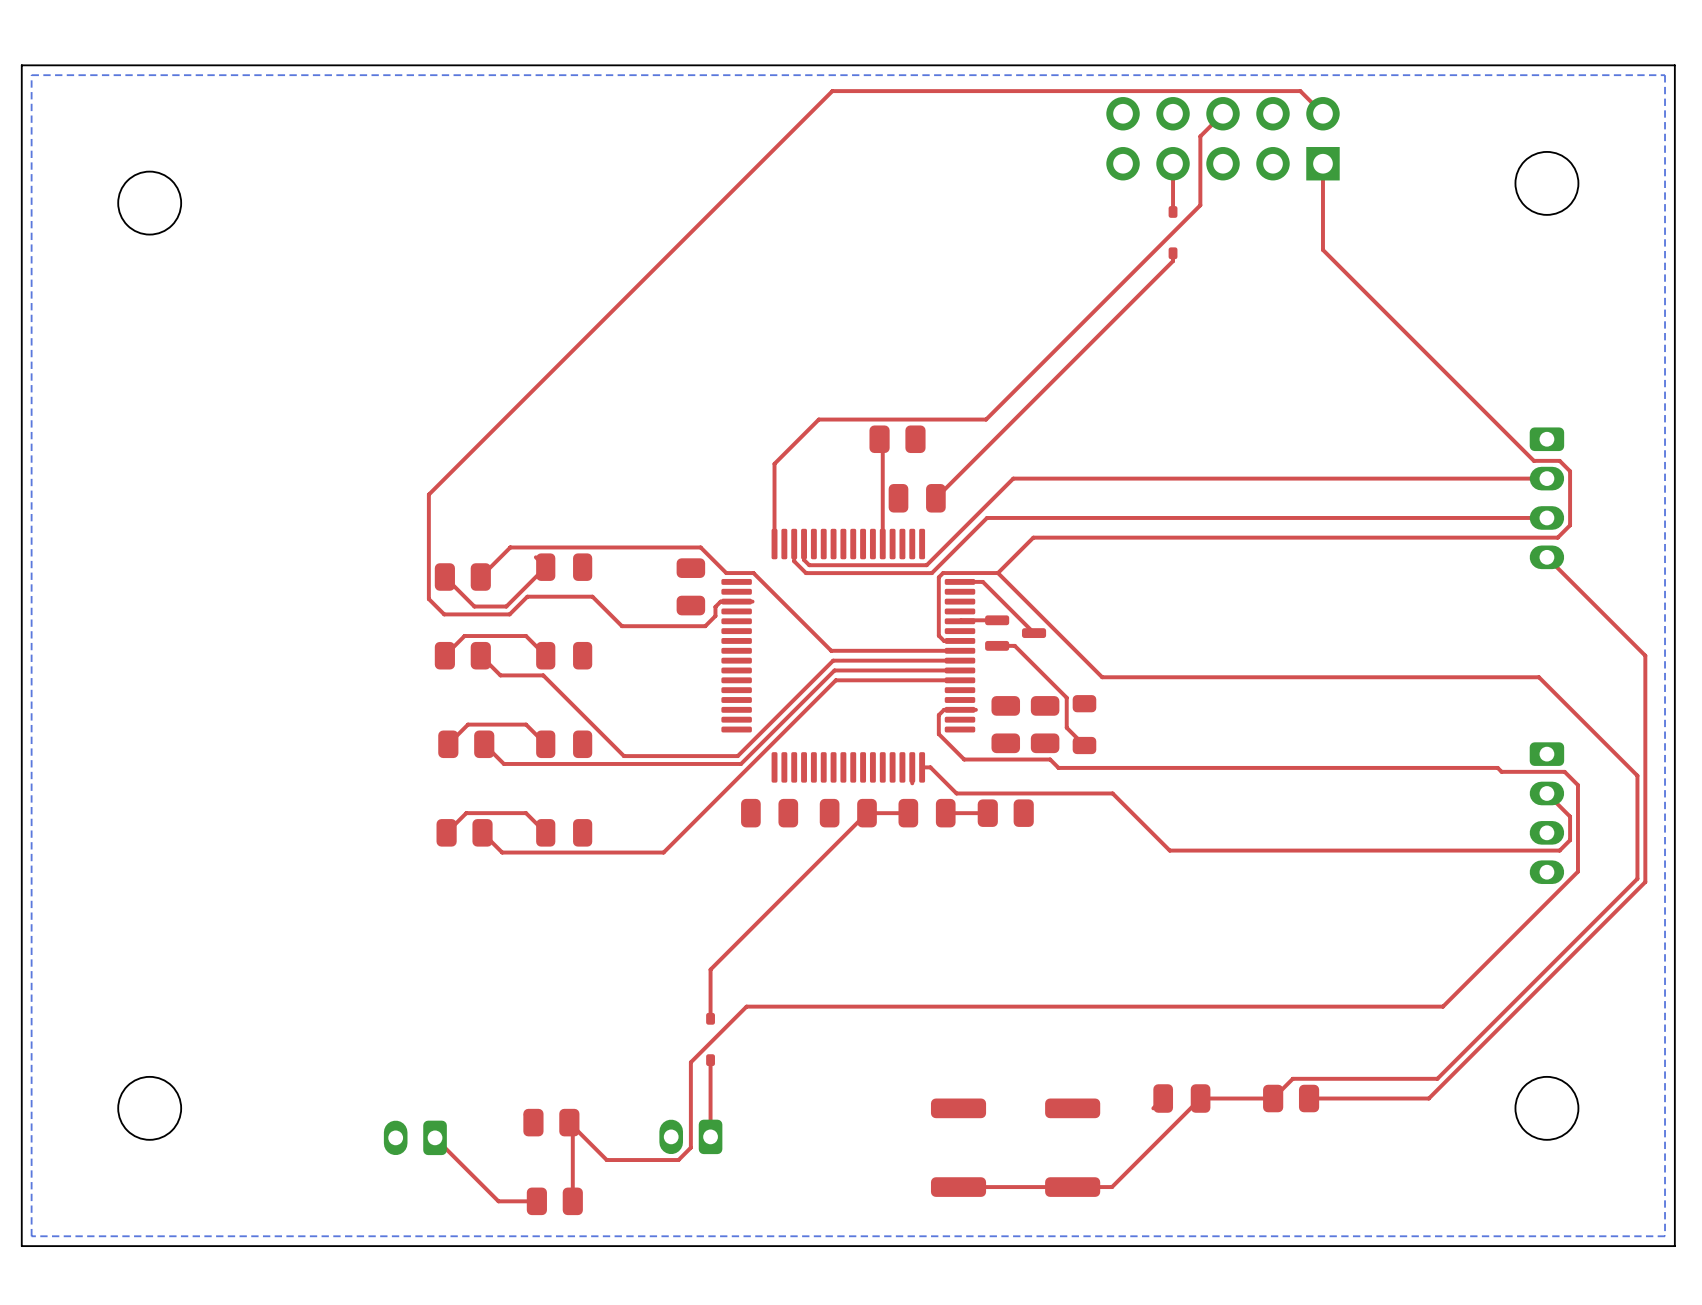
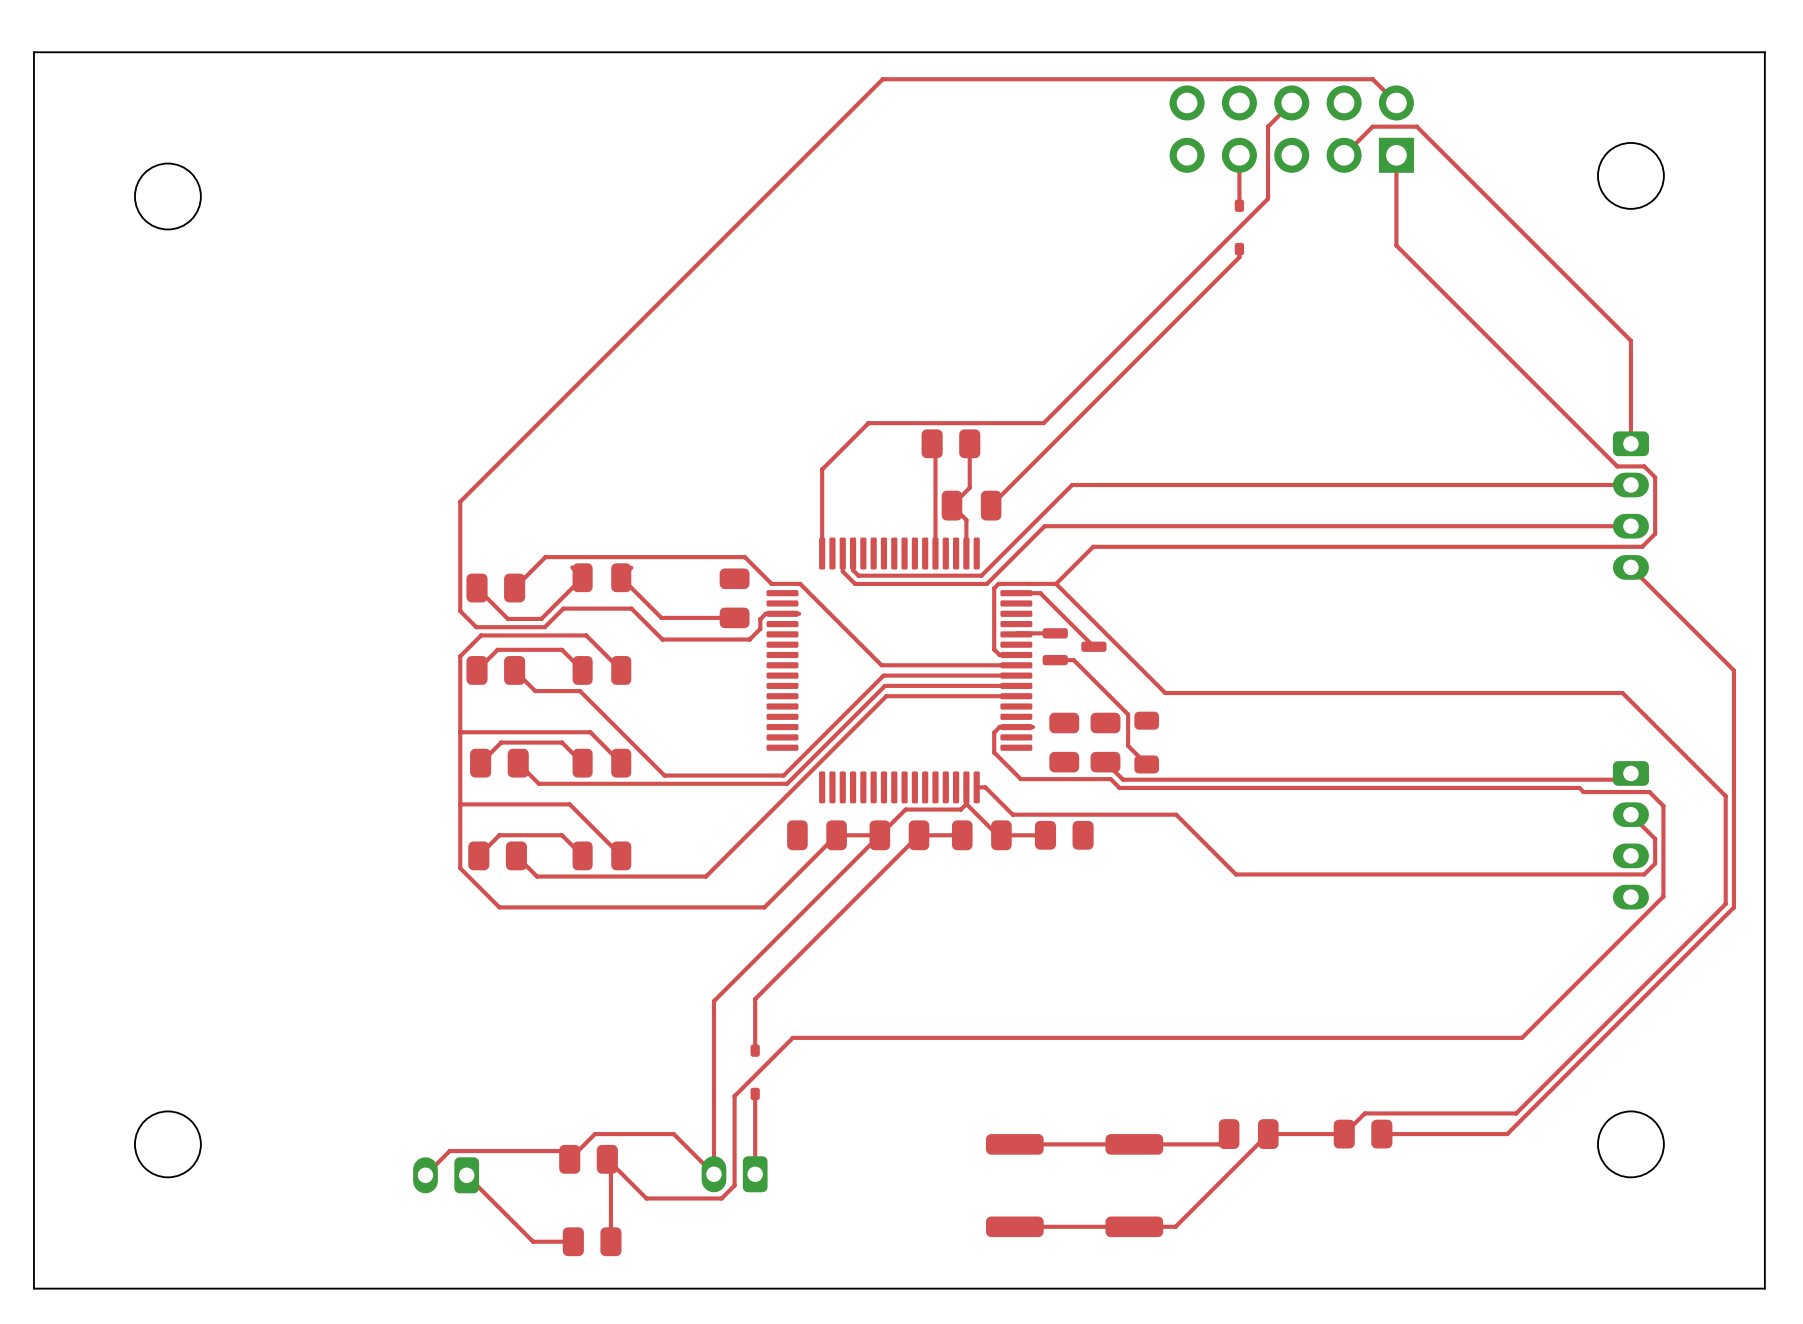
bottom zone outline: (1665, 75) (1665, 1236) (31, 1236) (31, 75) (1665, 75) -> none
top track: none -> (1344, 155) (1372, 126) (1416, 126) (1630, 340) (1630, 443)
top track: none -> (969, 443) (969, 487) (951, 505) (966, 520) (966, 553)
top track: none -> (631, 567) (621, 577) (661, 617) (734, 617)
top track: none -> (621, 670) (586, 635) (481, 635) (460, 656) (460, 868) (499, 907) (764, 907) (836, 835) (879, 835)
top track: none -> (460, 732) (590, 732) (621, 763)
top track: none -> (1105, 762) (1123, 779) (1624, 779)
top track: none -> (460, 804) (569, 804) (621, 855)
top track: none -> (997, 835) (966, 804) (960, 809) (905, 809) (713, 1001) (713, 1174) (673, 1134) (594, 1134) (569, 1159)
top track: none -> (1218, 1144) (1014, 1144)
top track: none -> (561, 1151) (449, 1151) (425, 1175)

